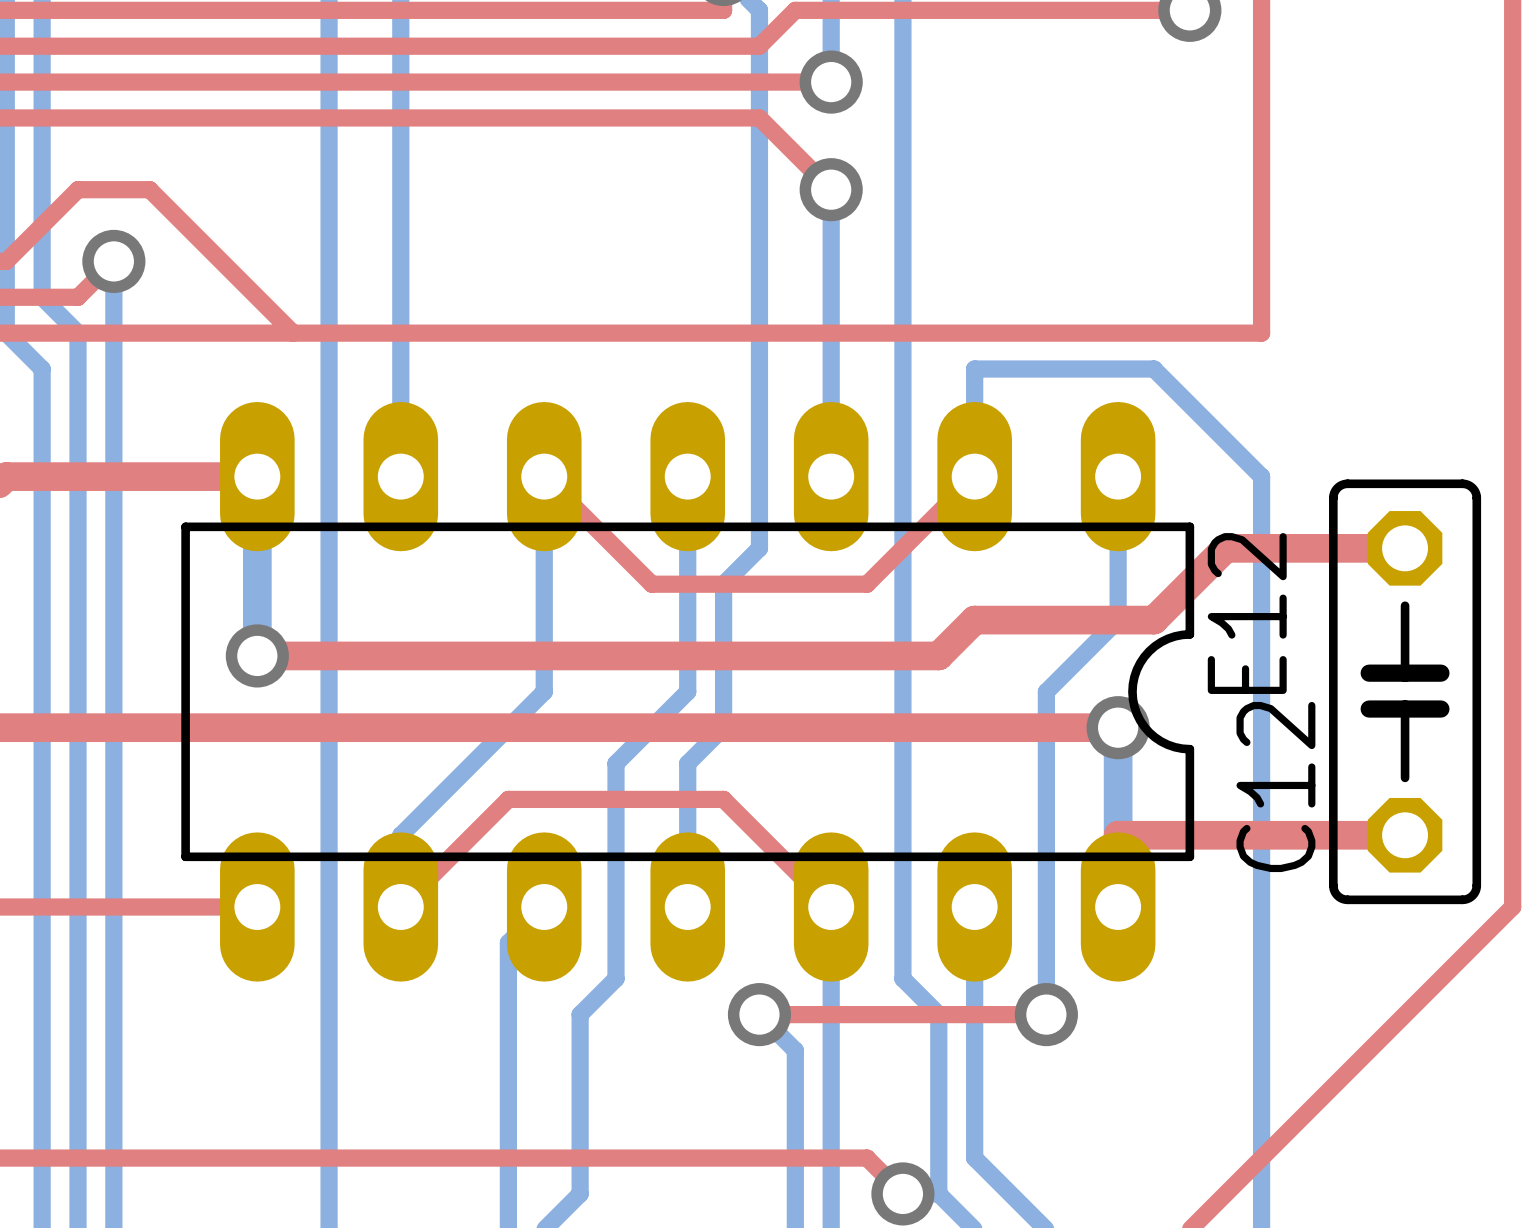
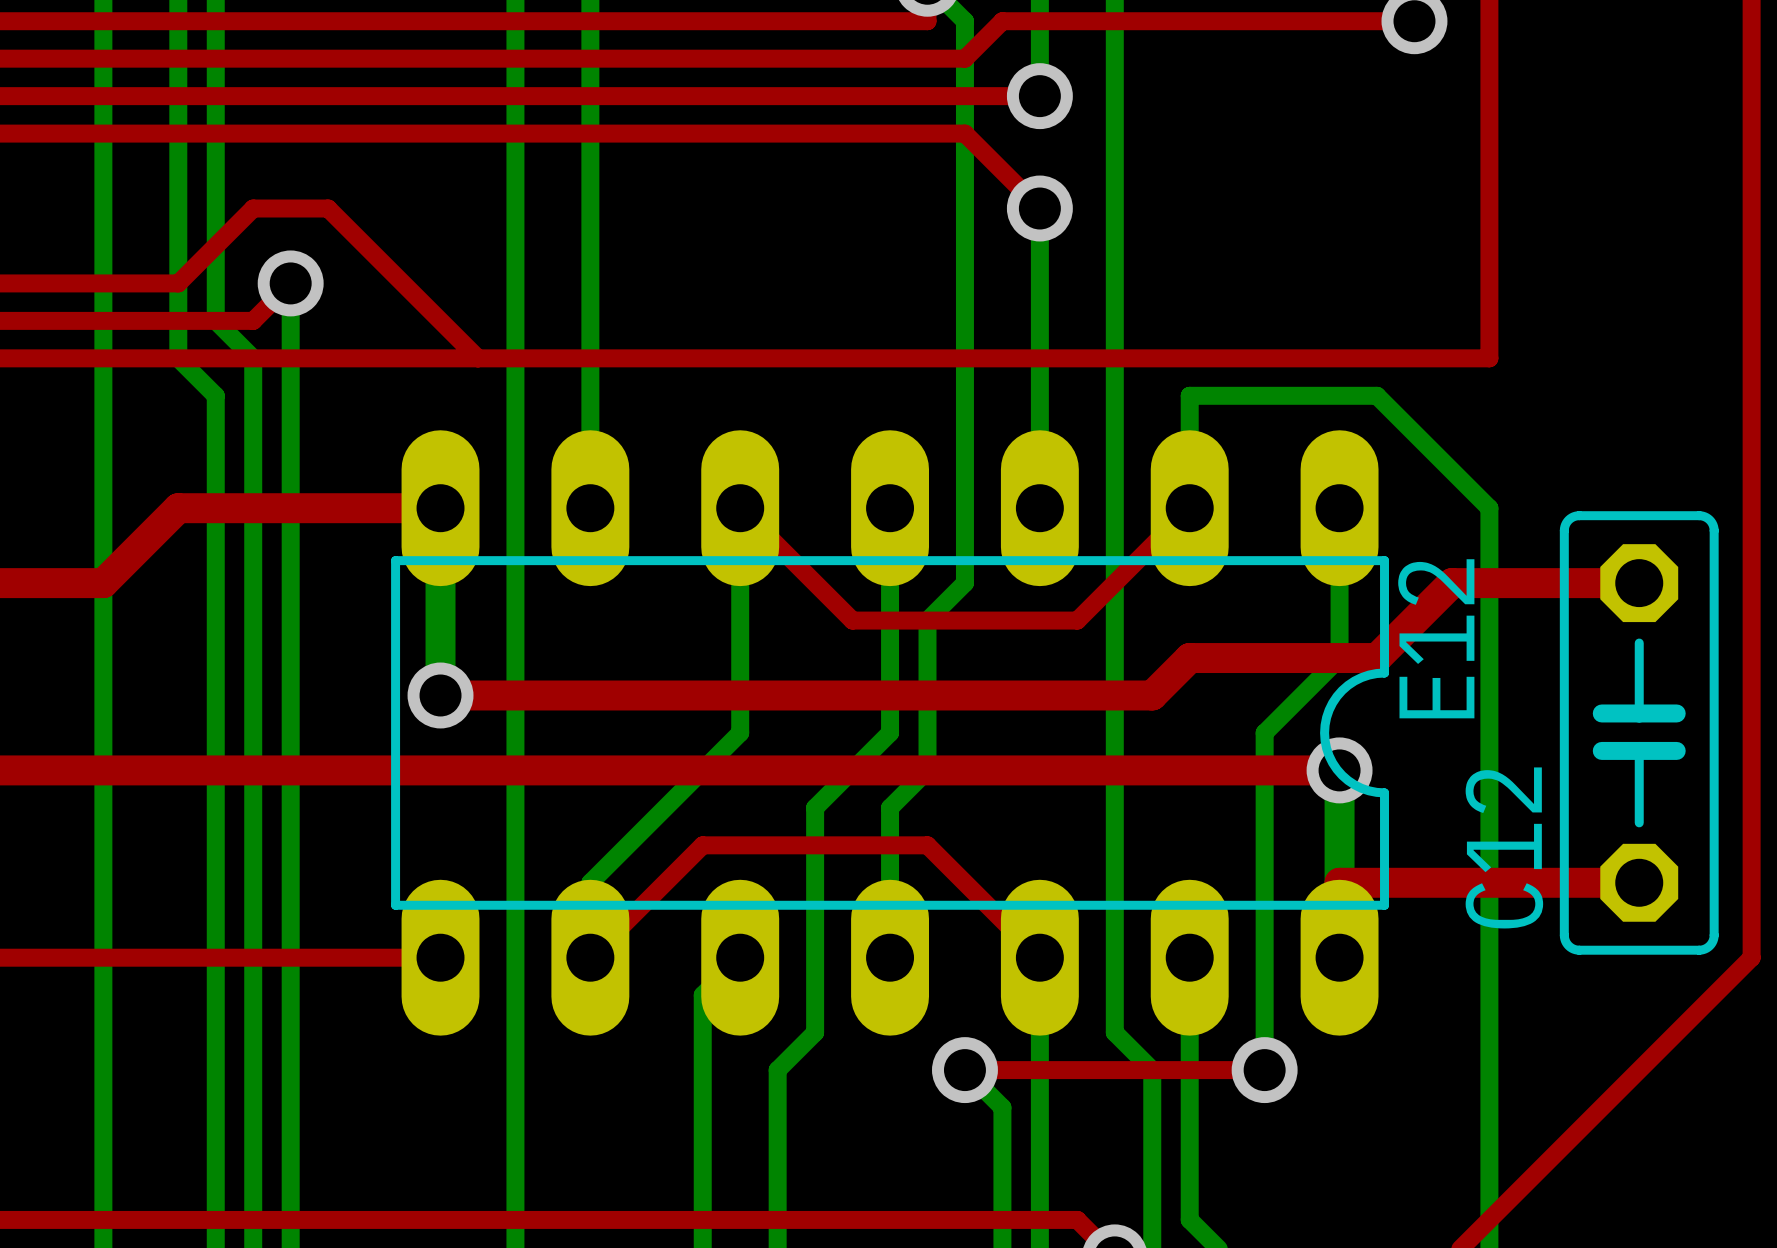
E12 footprint: [181, 402, 1195, 982] -> [391, 430, 1390, 1036]
E12 name position: E12 (1247, 613) -> E12 (1436, 638)

